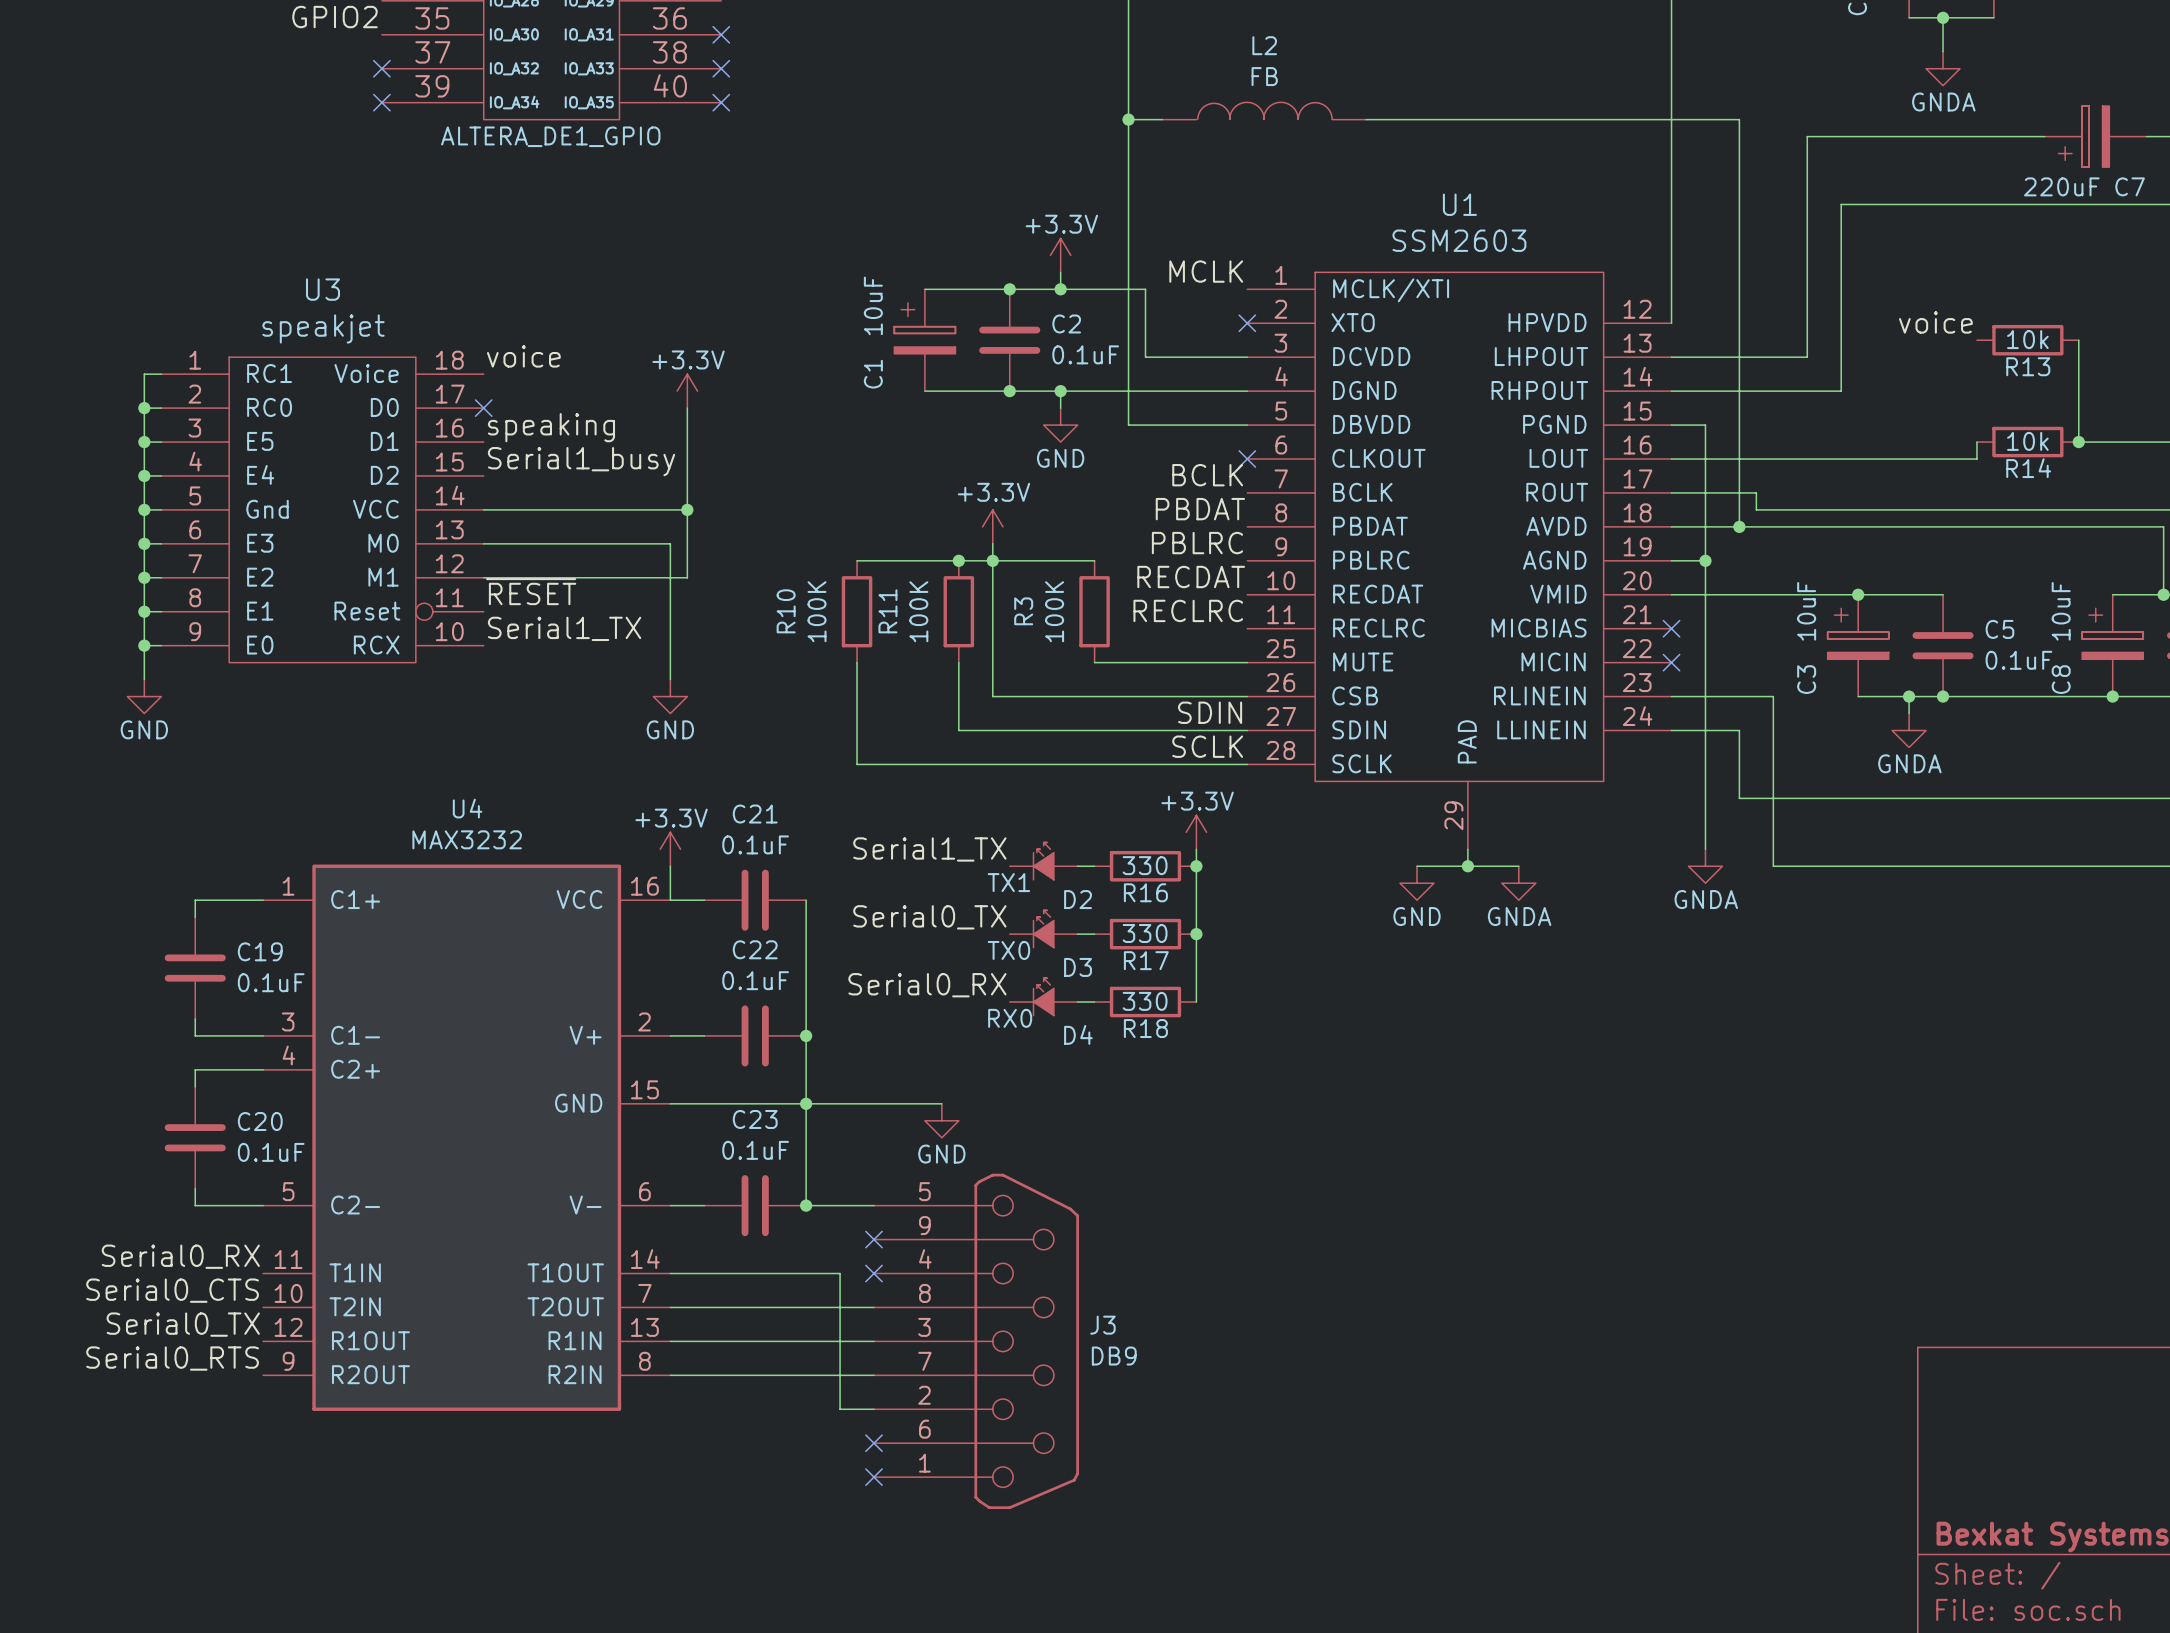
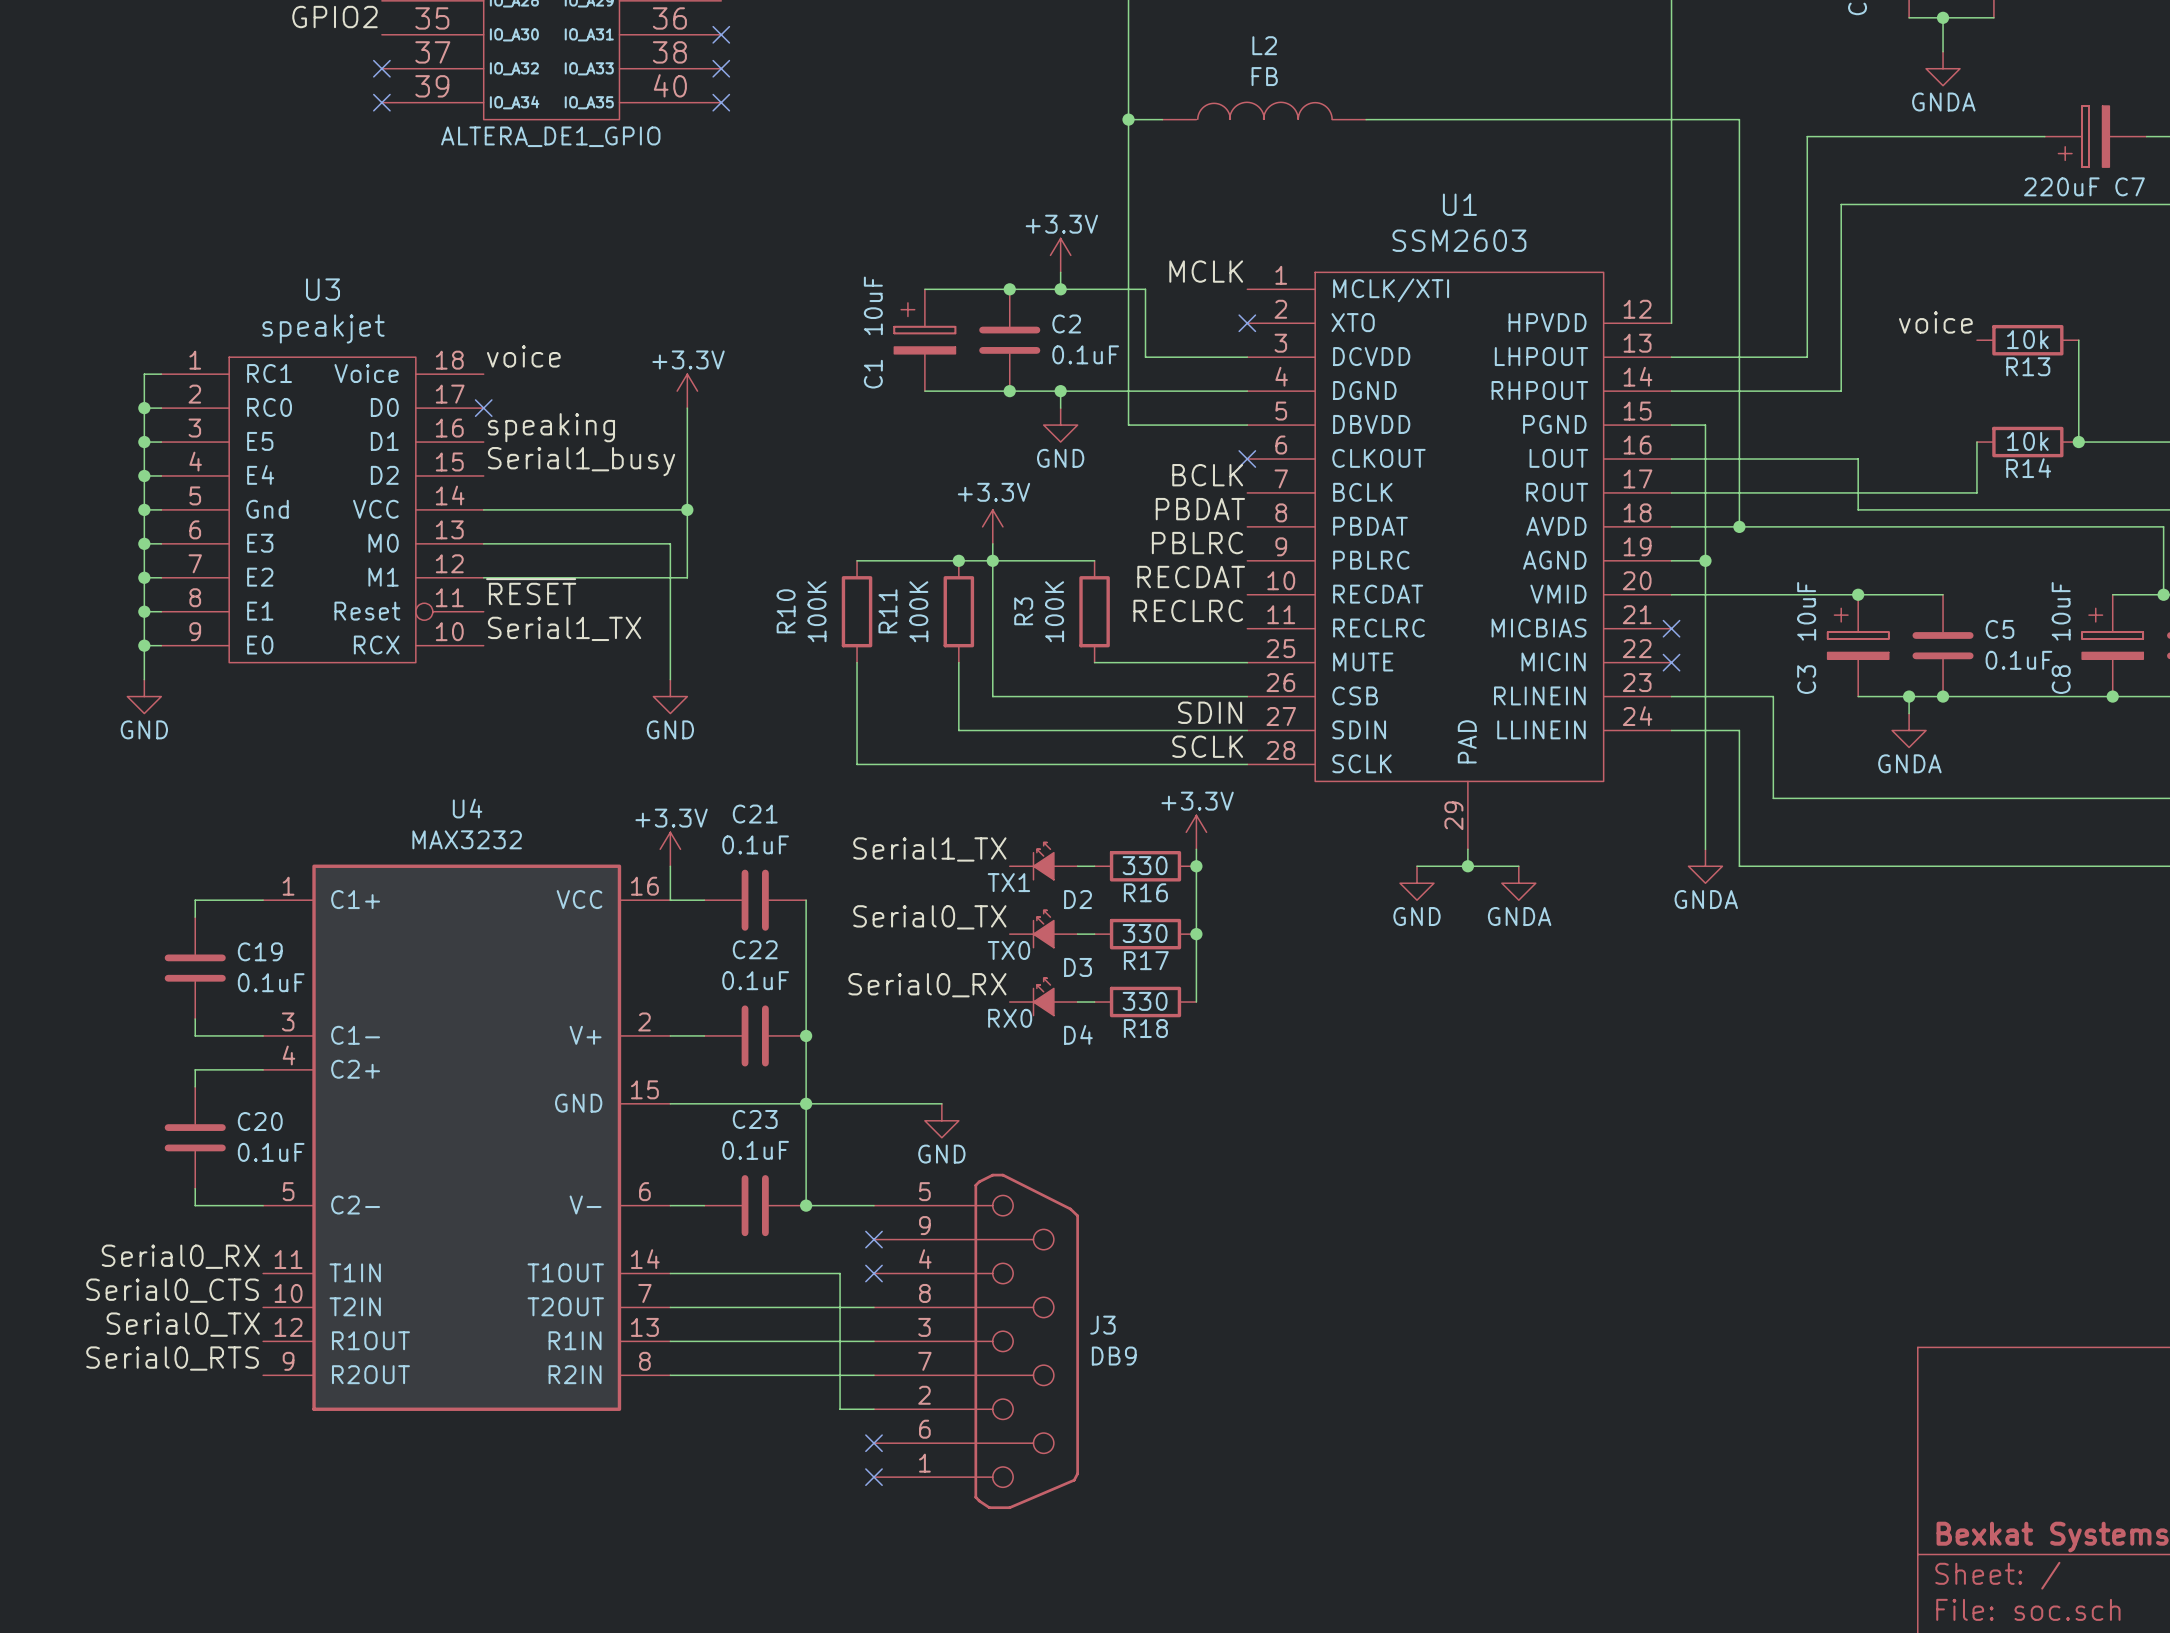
wire: (1858, 459) (1976, 459) -> (1756, 492) (1976, 492) (1976, 459)
wire: (1756, 492) (1756, 509) (1858, 509) -> (1858, 459) (1858, 509)
wire: (1739, 798) (1773, 798) (1773, 866) -> (1739, 798) (1739, 866) (1773, 866)

